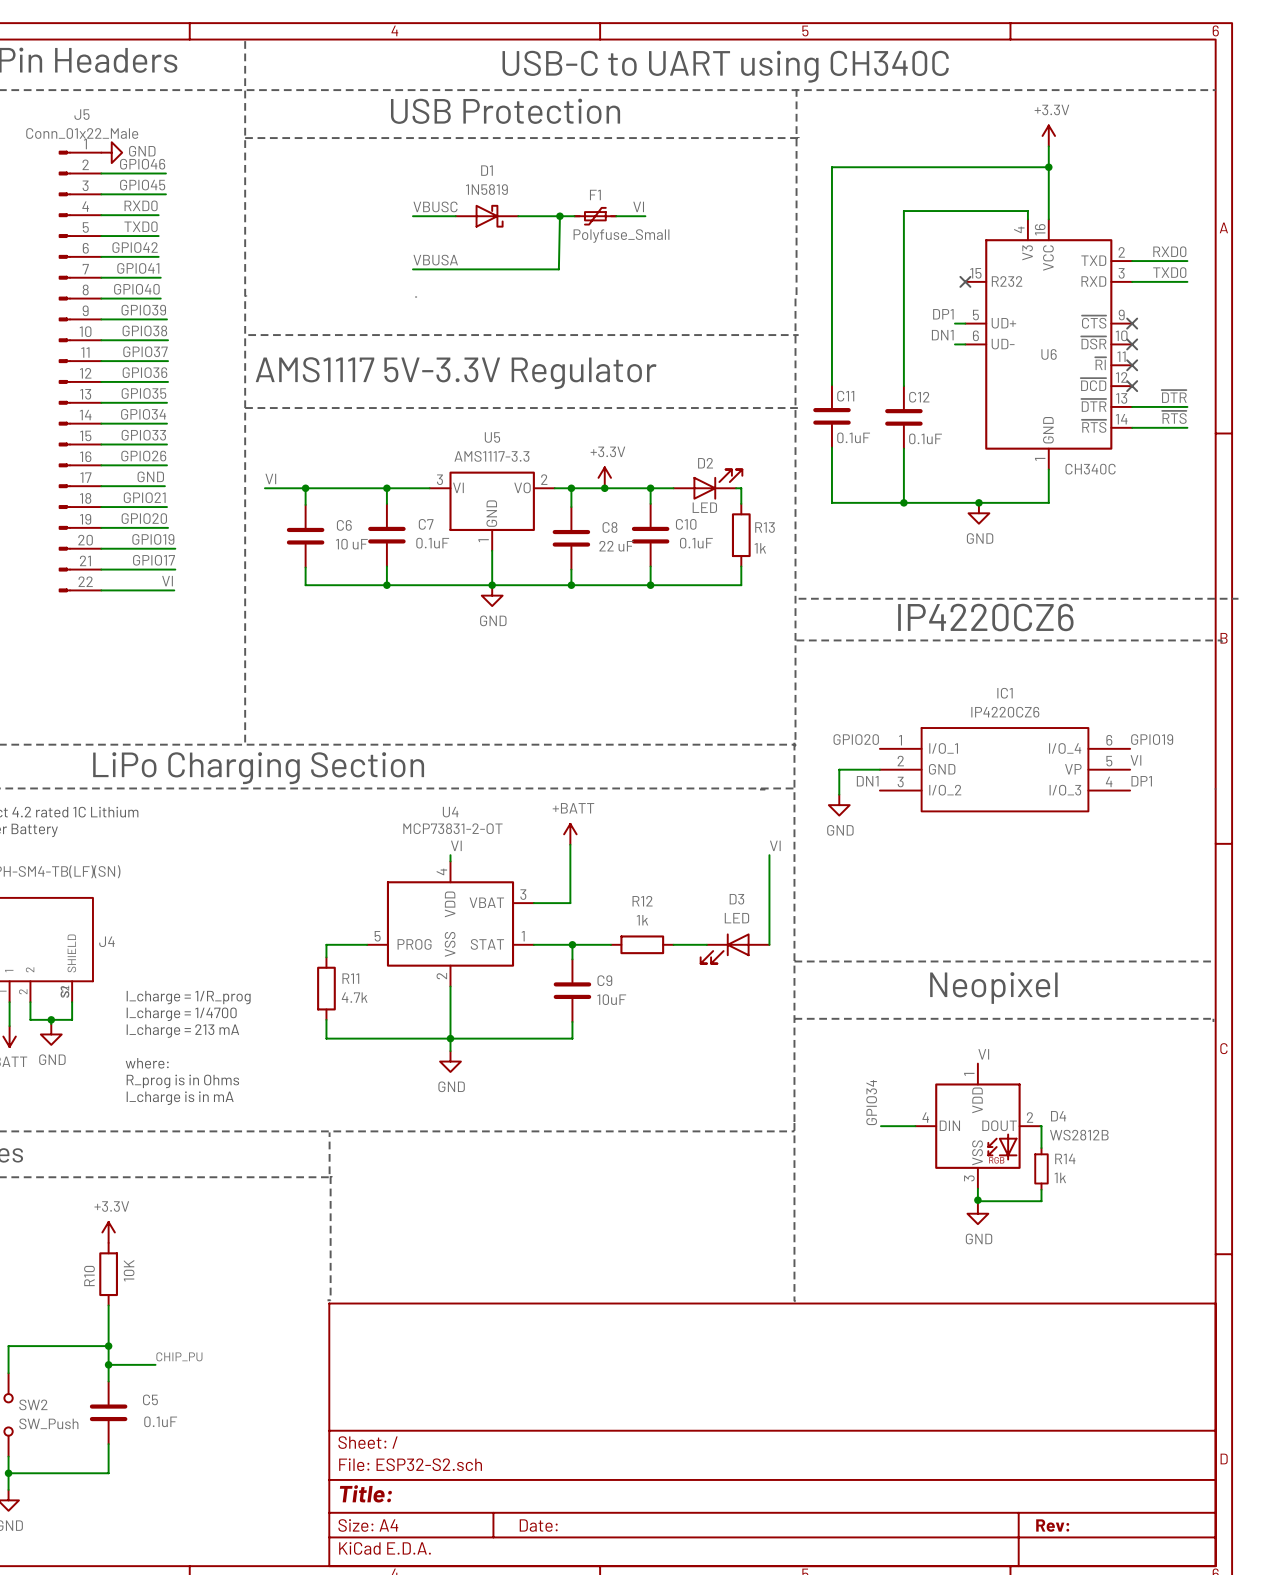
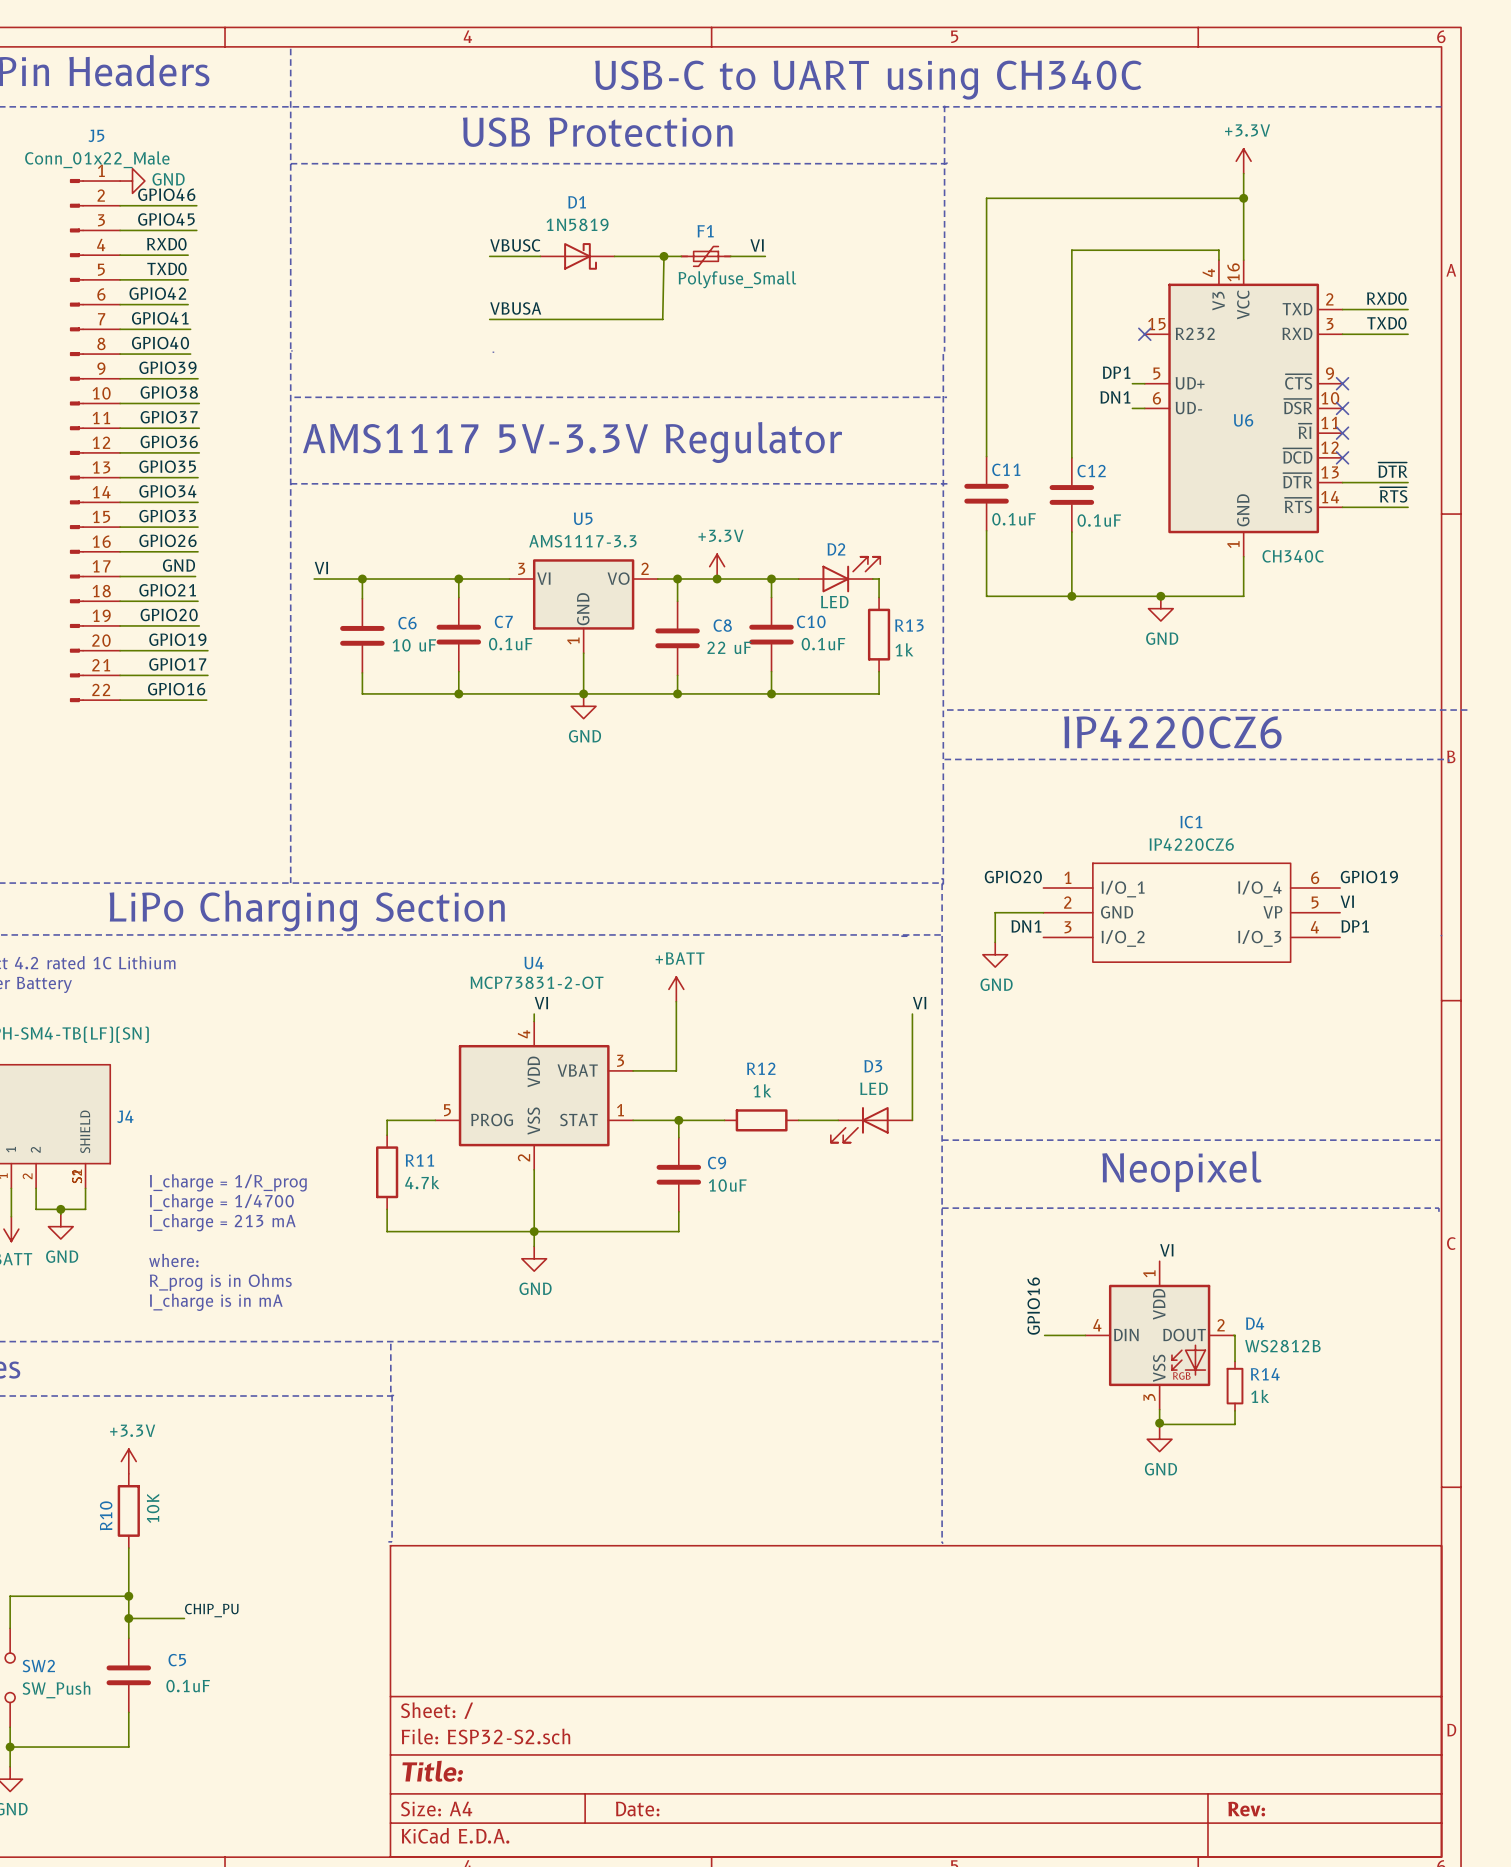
label: VI (167, 581) -> GPIO16 (176, 689)
label: GPIO34 (871, 1102) -> GPIO16 (1033, 1306)

